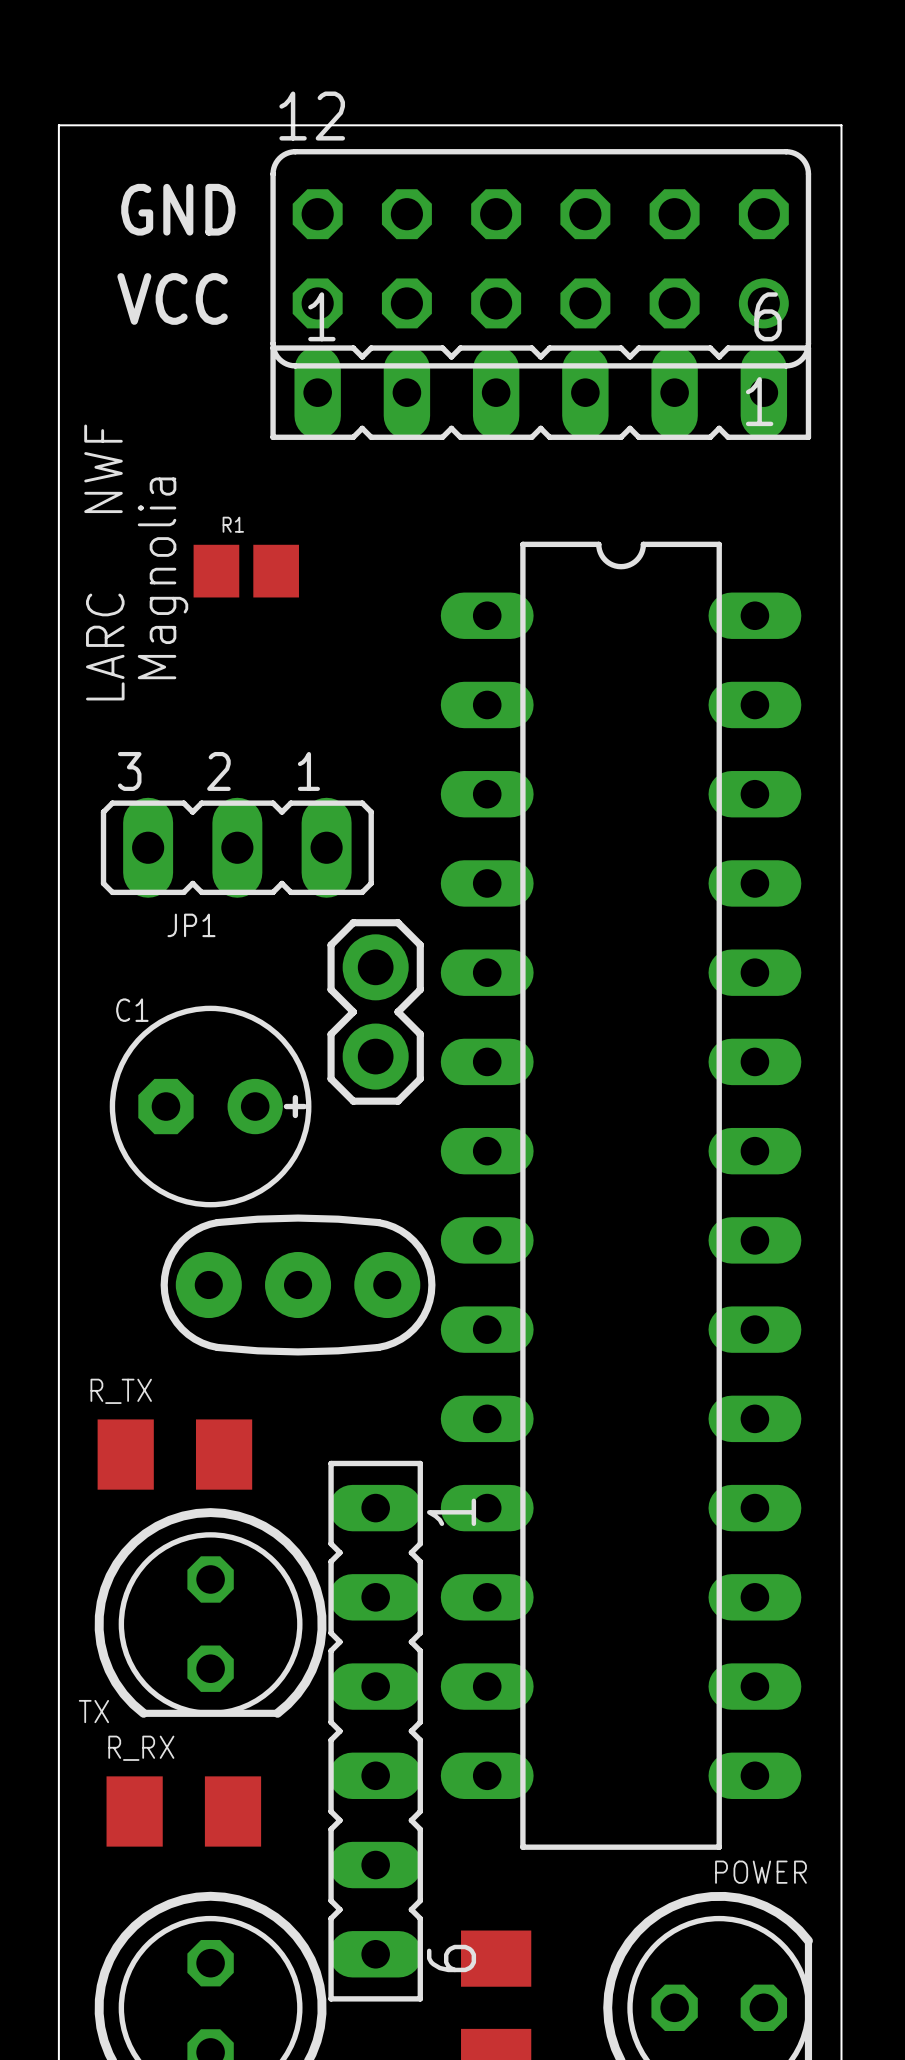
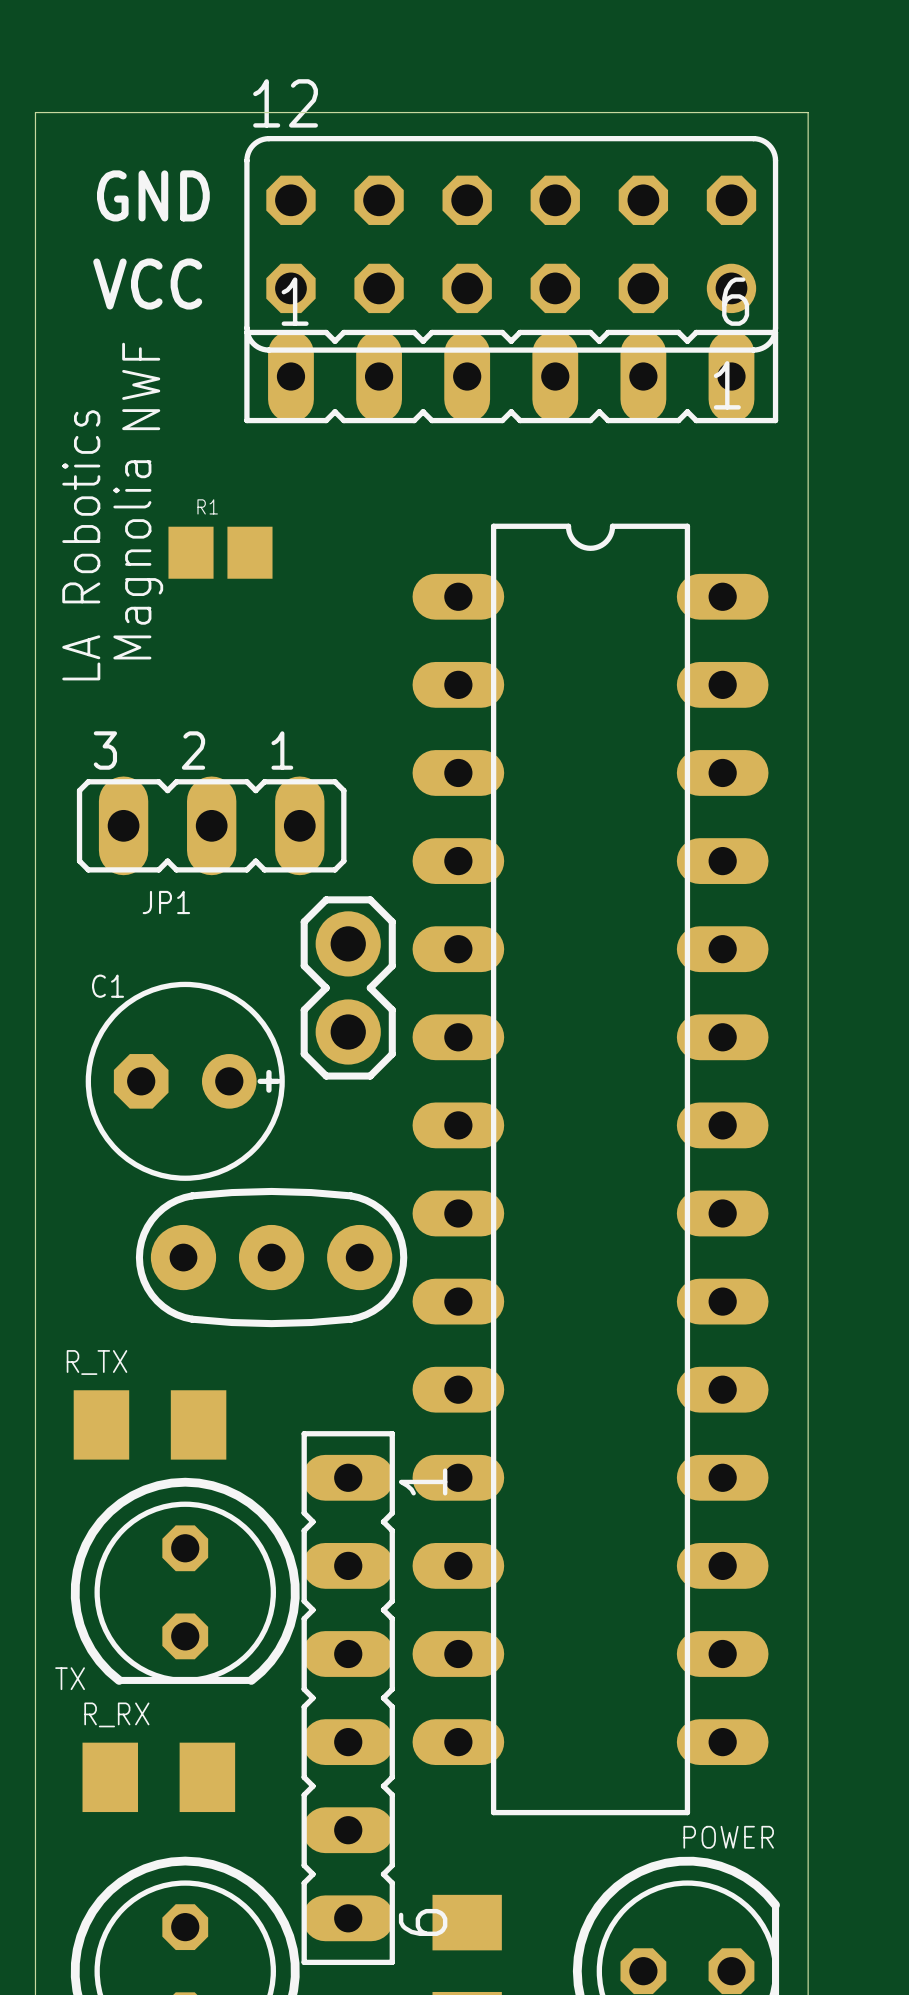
text position: NWF (103, 468) -> NWF (141, 386)
text: LARC (105, 647) -> LA Robotics (81, 545)

